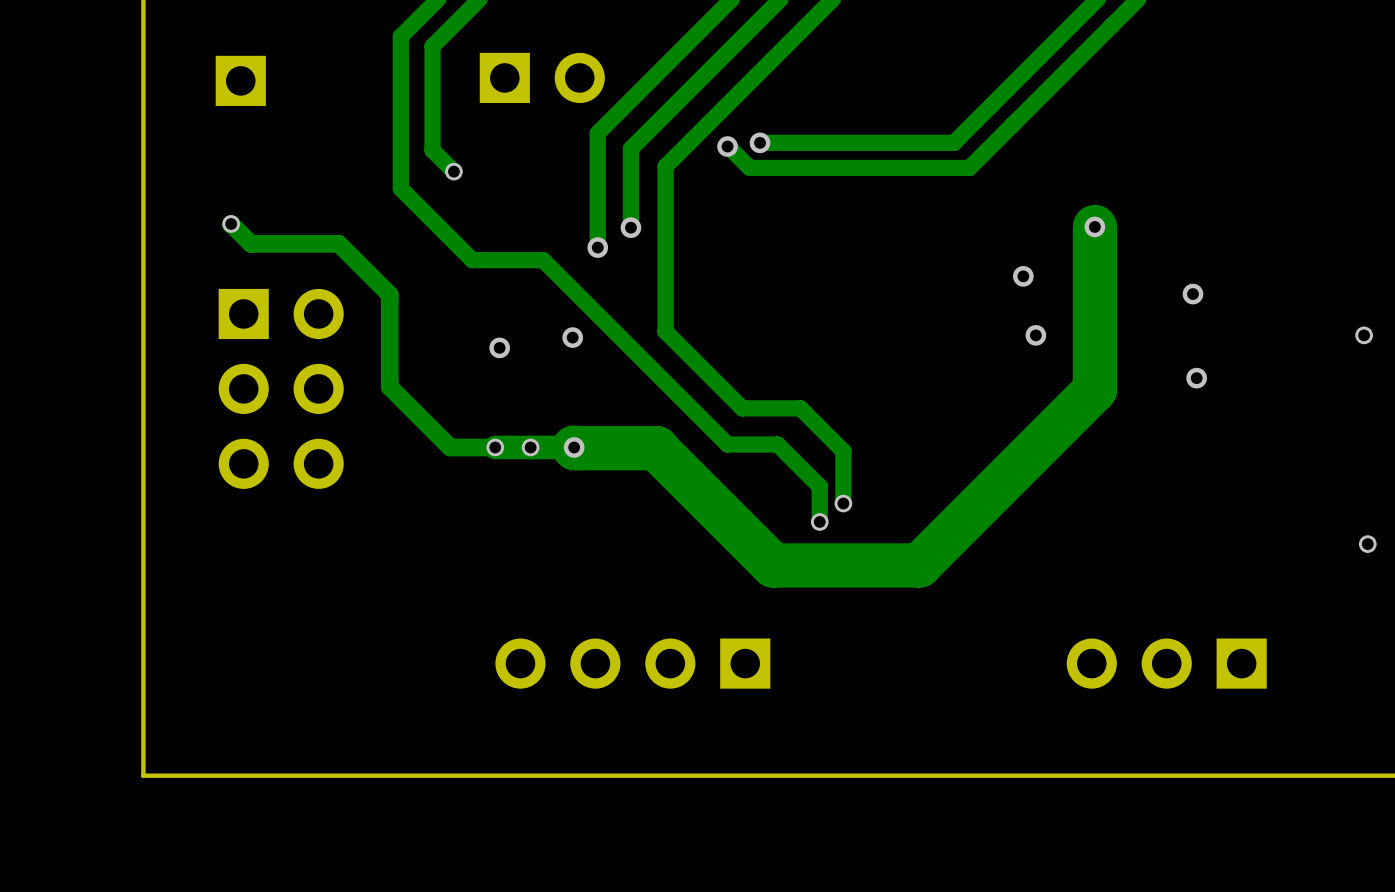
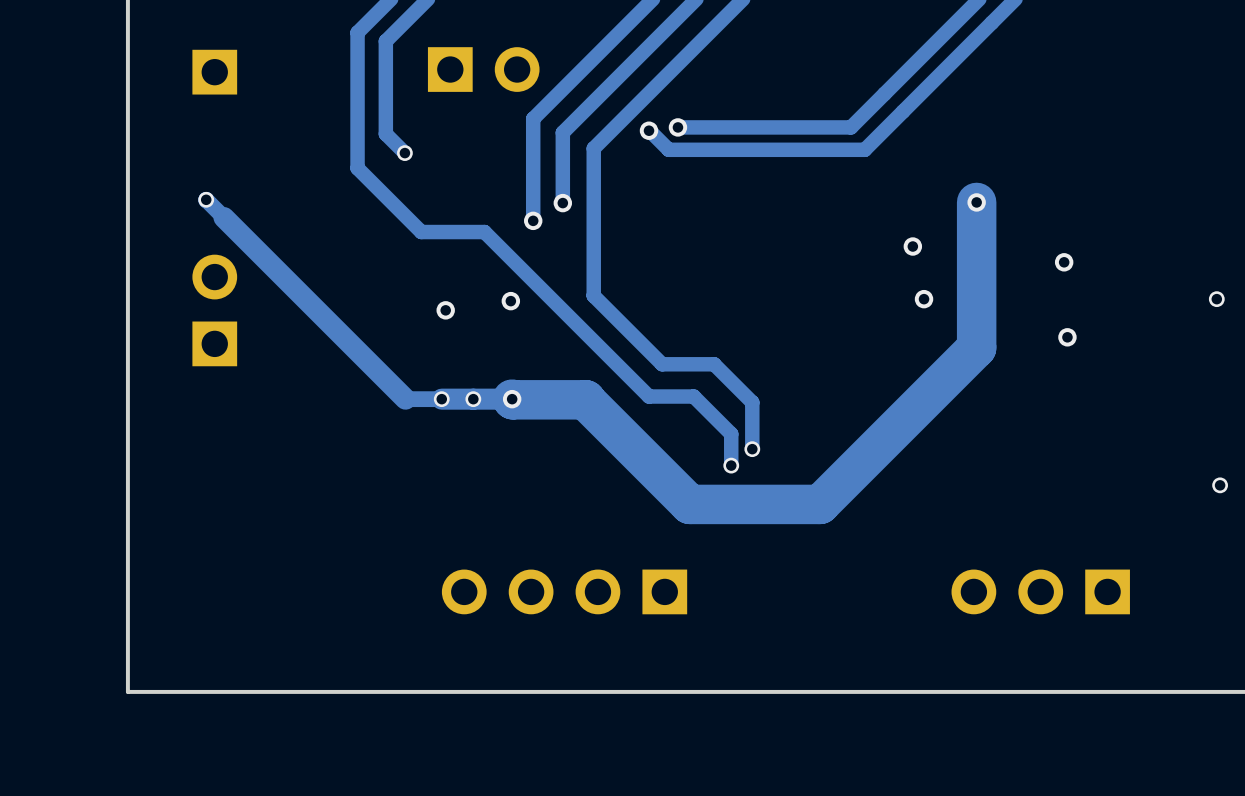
track: (251, 243) (338, 243) (389, 294) (389, 386) (450, 447) (454, 447) -> (223, 217) (405, 399)
part: none -> (214, 310)
part: (281, 388) -> none

